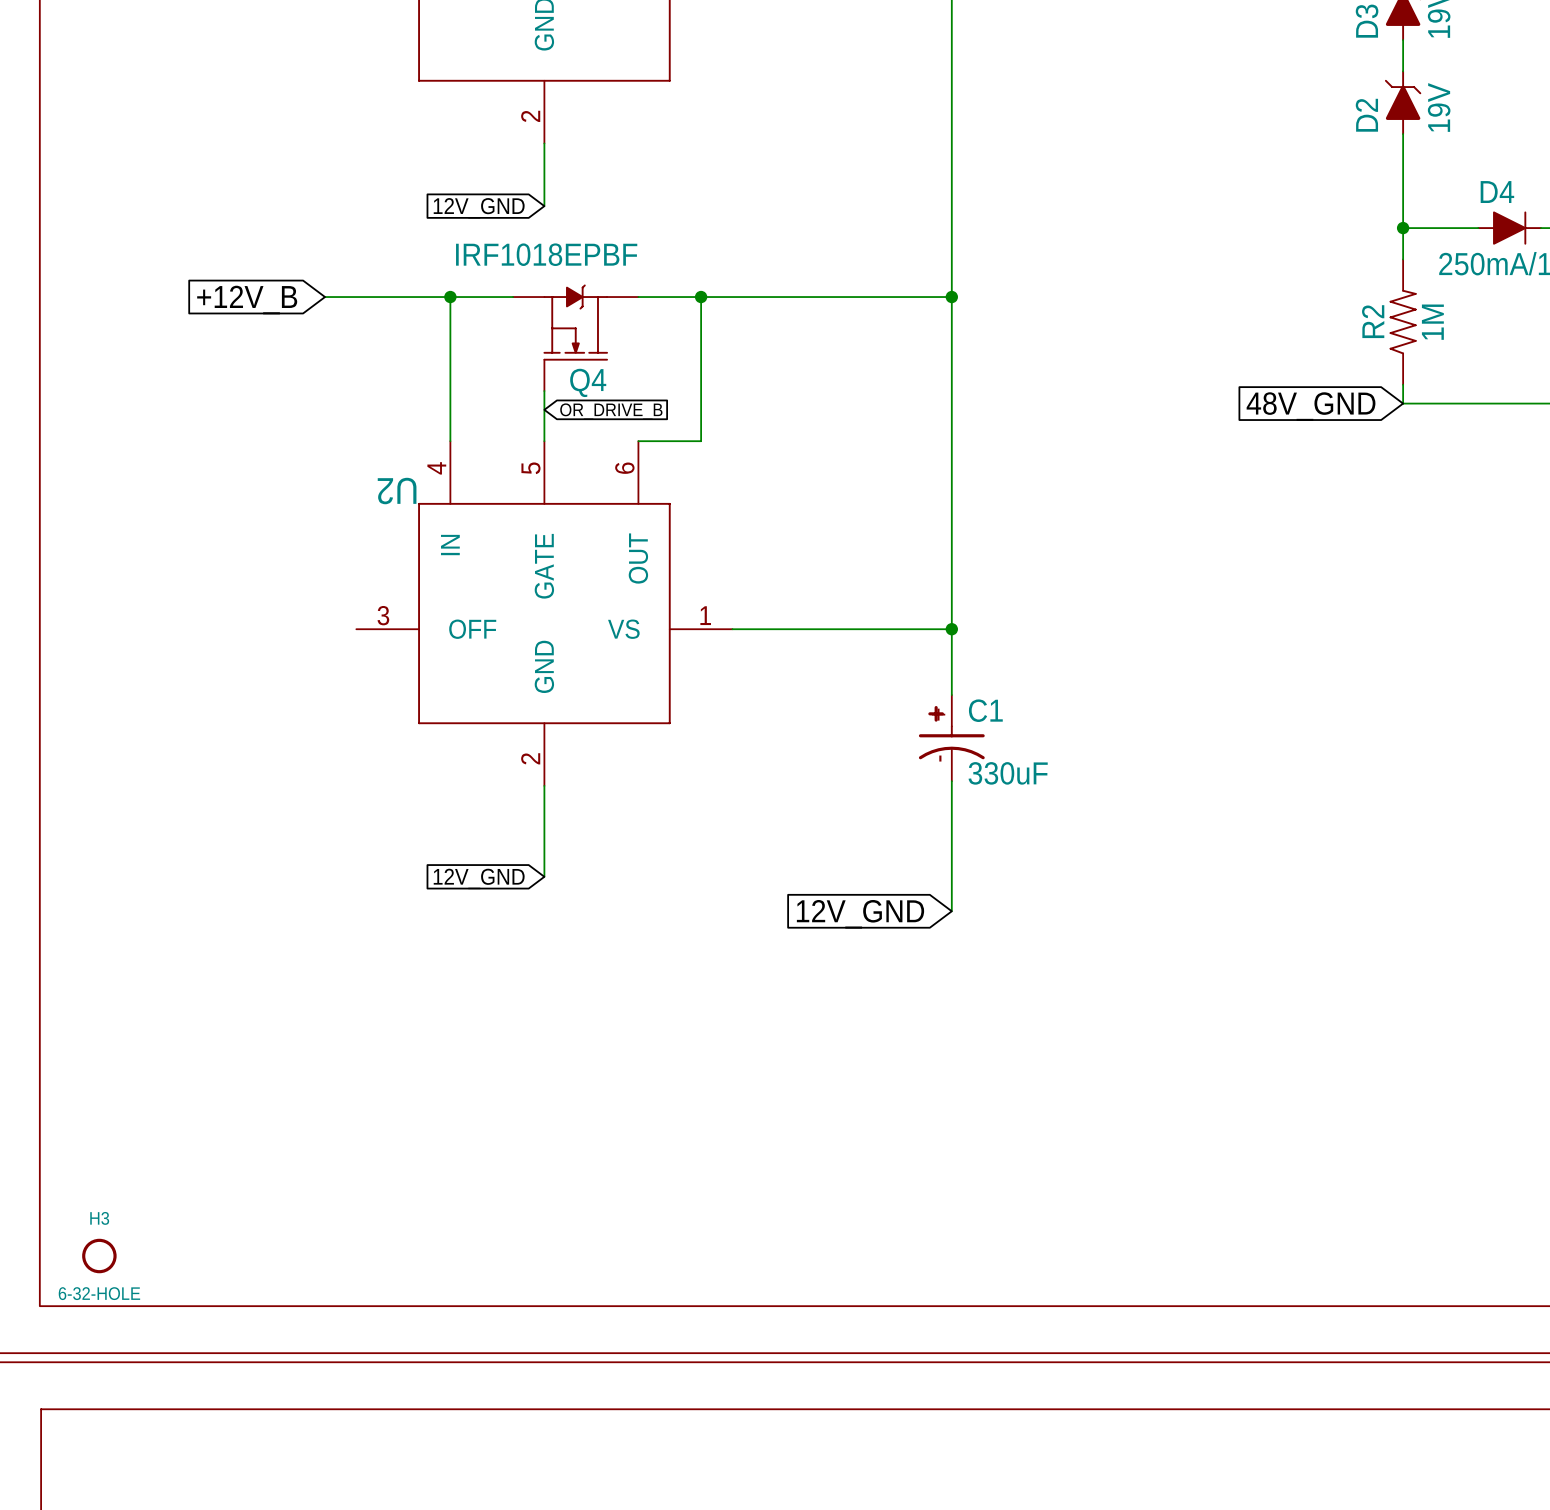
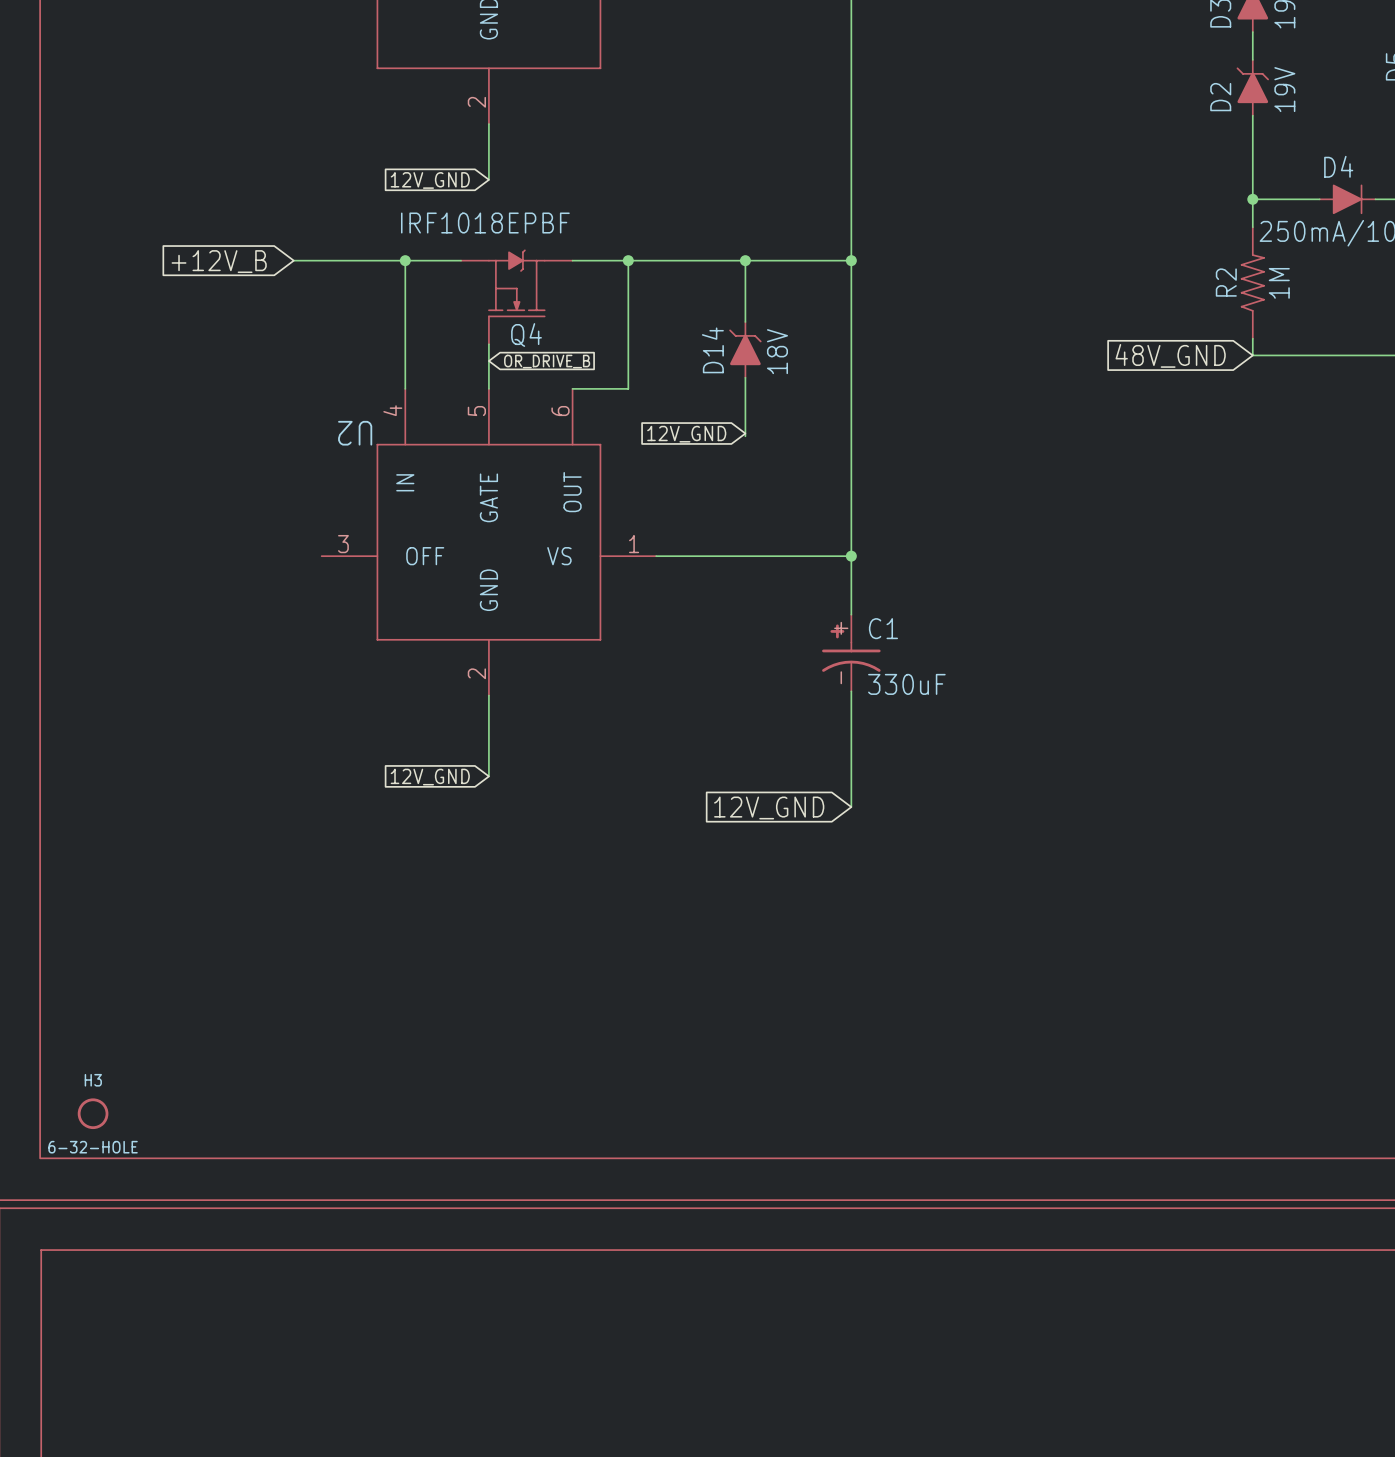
wire: none -> (745, 260) (745, 321)
junction: none -> (745, 260)
D14: none -> 18V (745, 349)
wire: none -> (745, 377) (745, 436)
global label: none -> 12V_GND (686, 434)

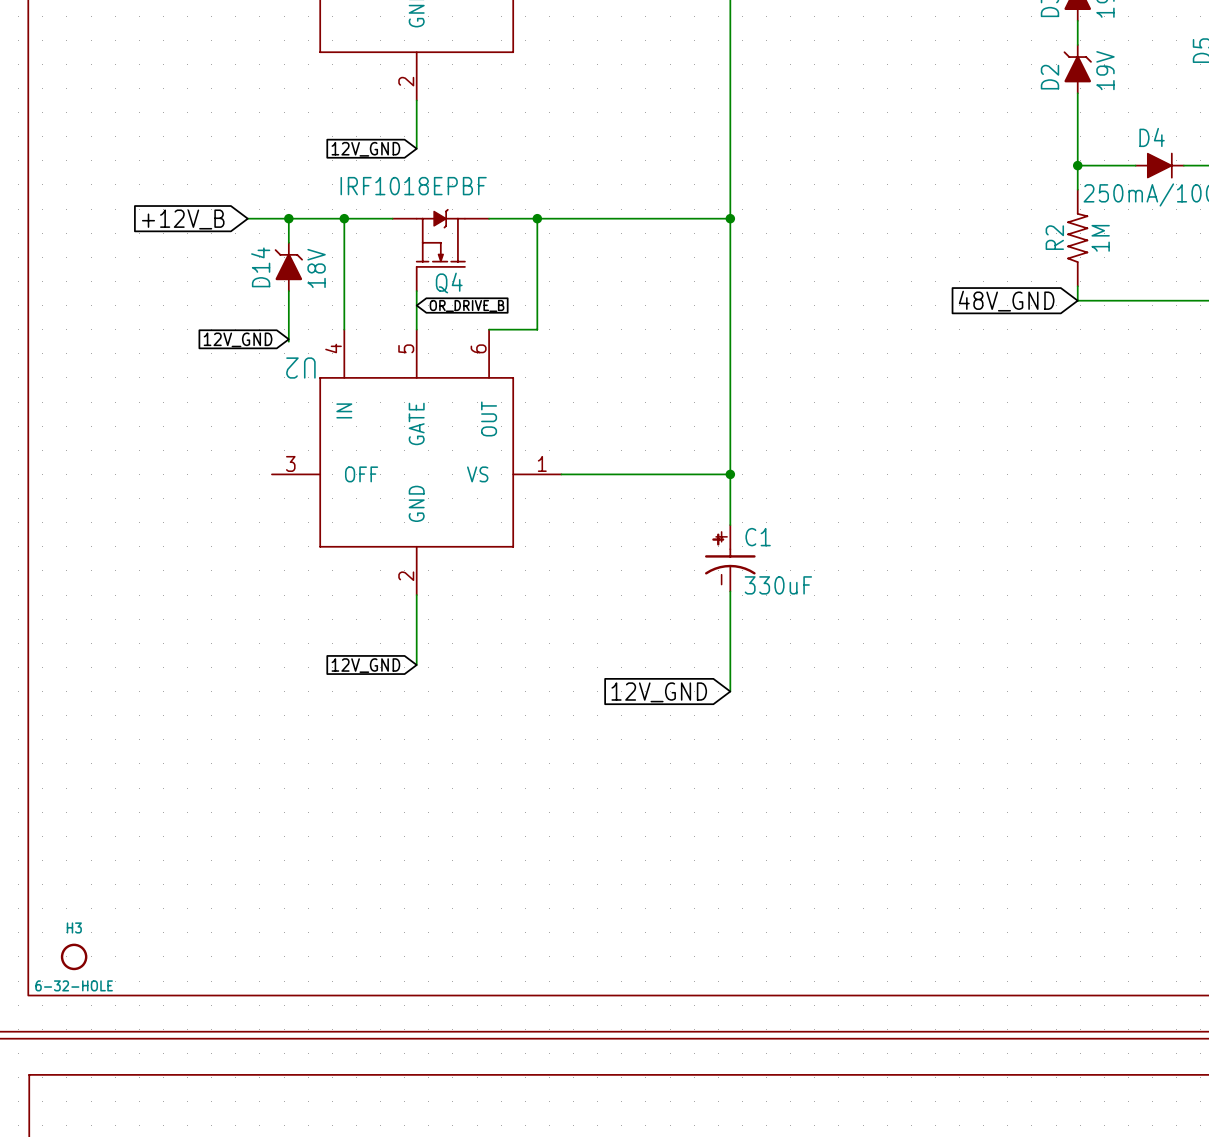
wire: none -> (288, 218) (288, 242)
junction: none -> (288, 218)
wire: (745, 260) (745, 321) -> none
junction: (745, 260) -> none
wire: none -> (288, 291) (288, 341)
D14 position: (745, 349) -> (288, 266)
wire: (745, 377) (745, 436) -> none
global label: none -> 12V_GND (238, 339)
global label: 12V_GND (686, 434) -> none

